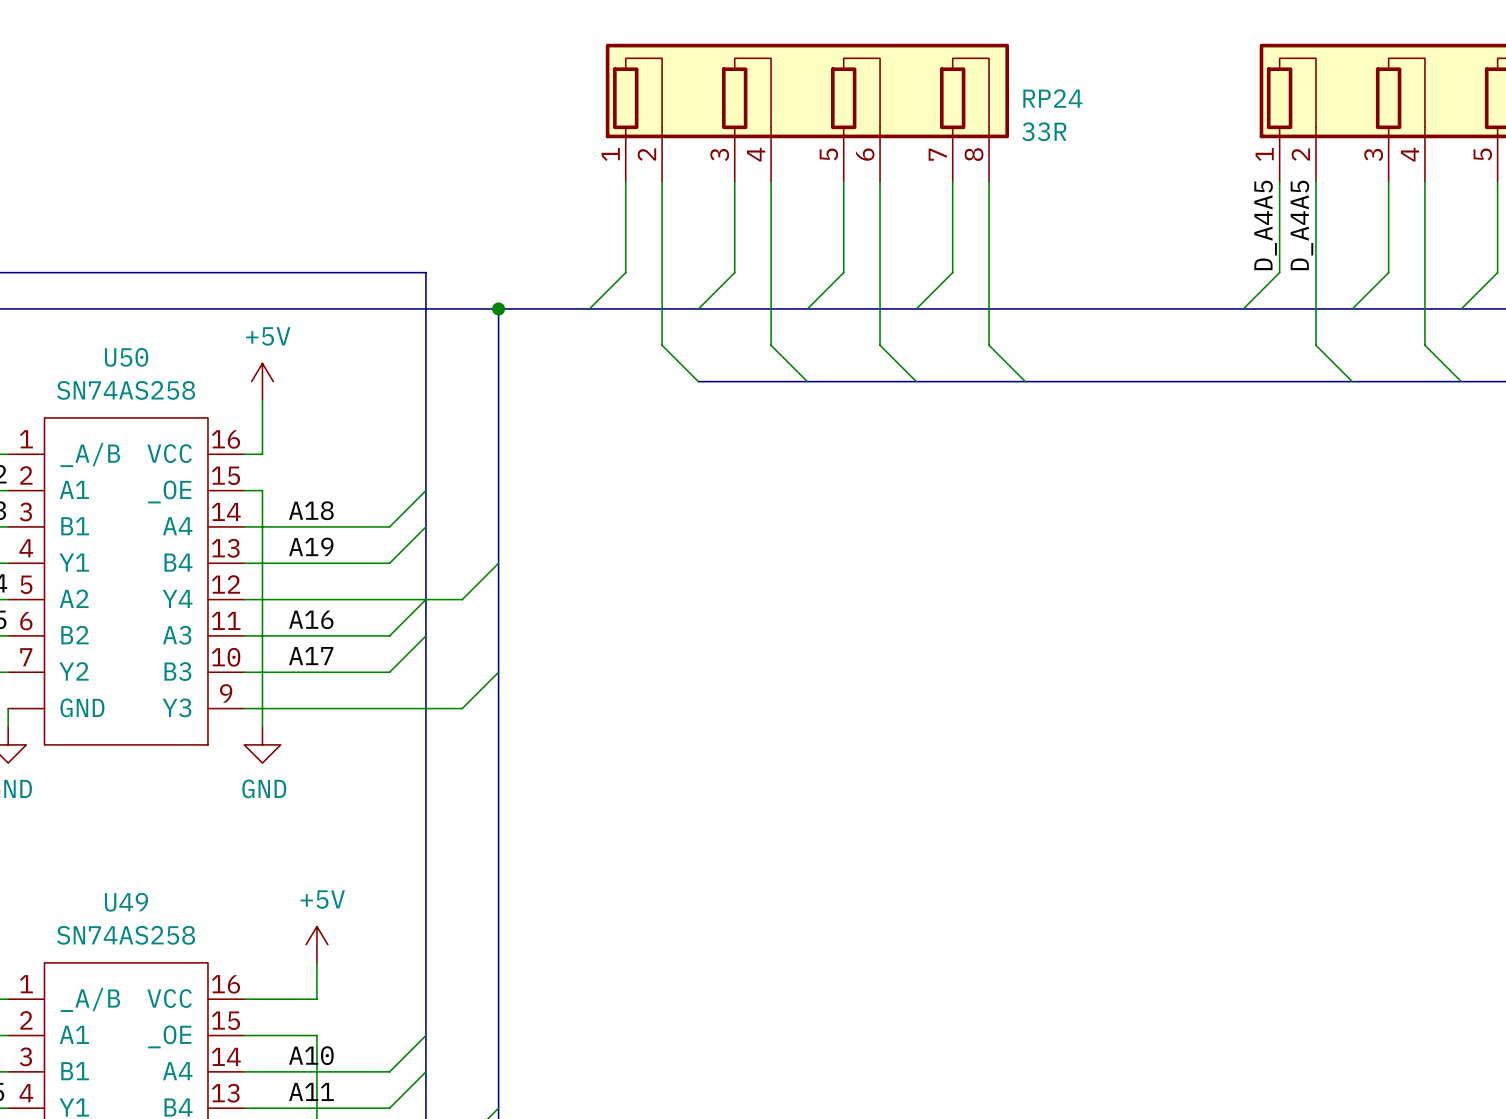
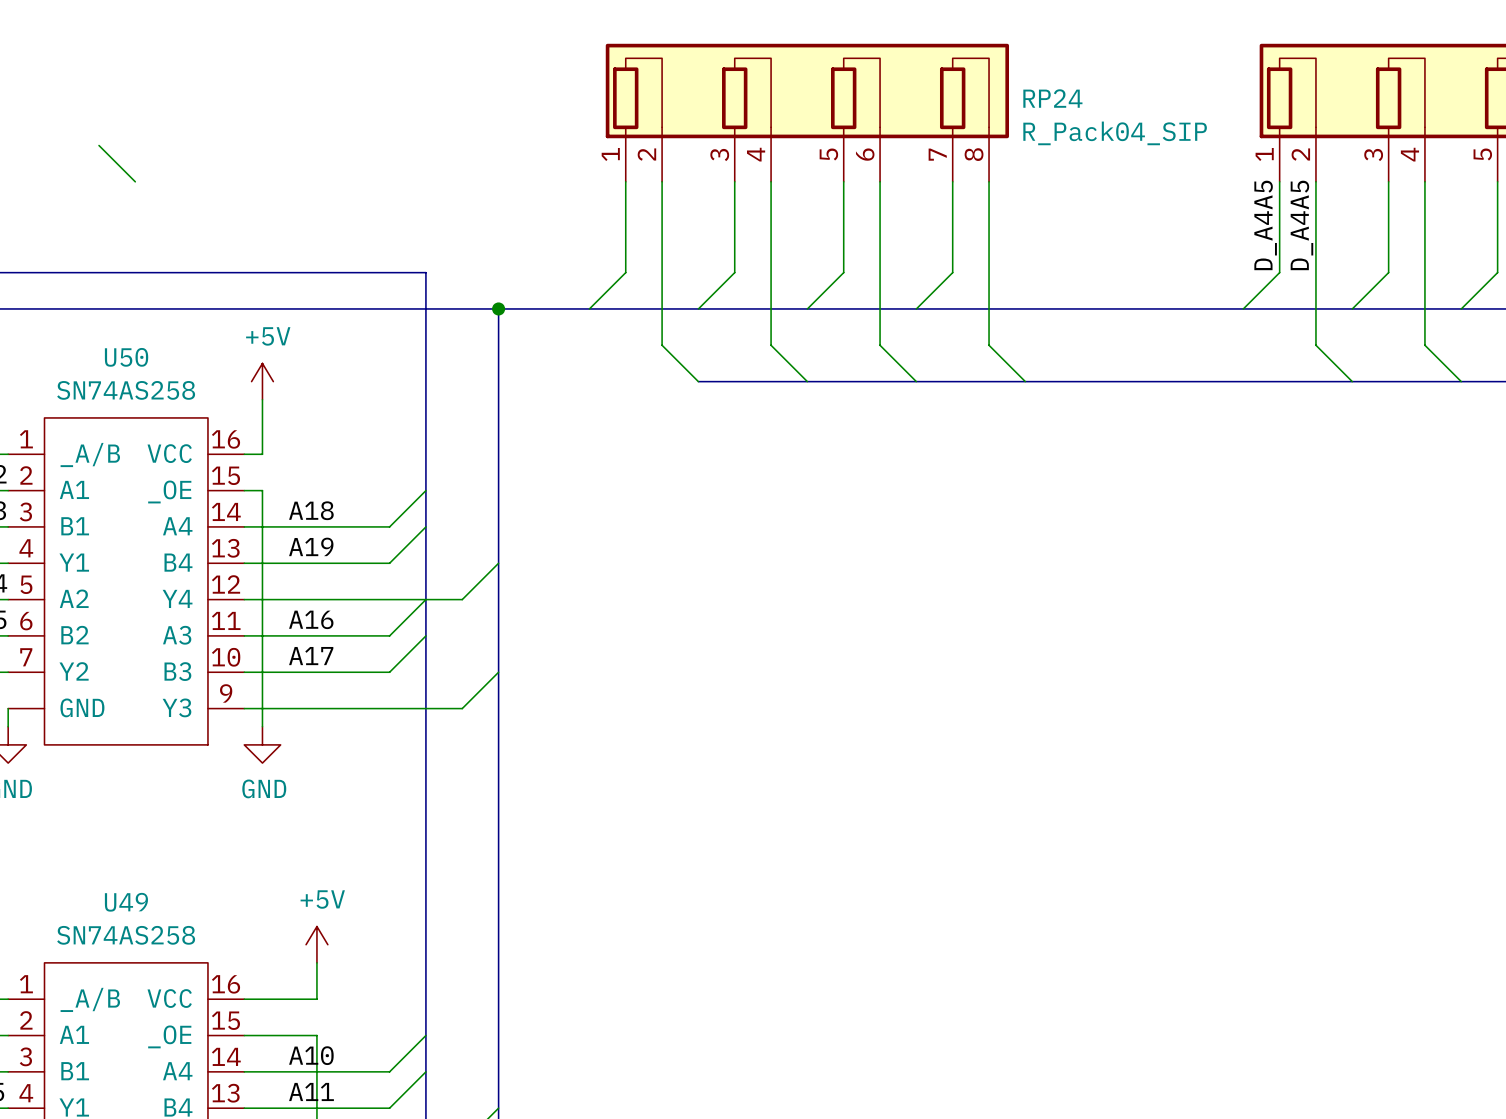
RP24 value: 33R (1044, 131) -> R_Pack04_SIP (1115, 133)
wire: none -> (98, 145) (135, 181)

